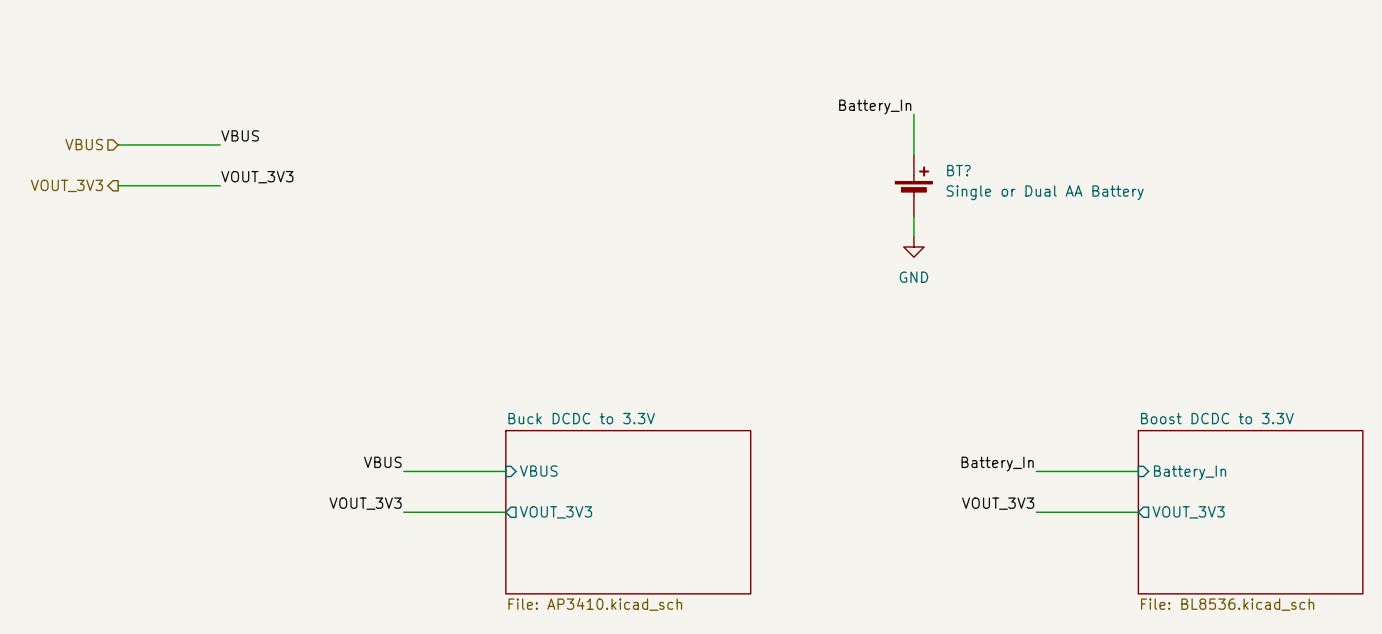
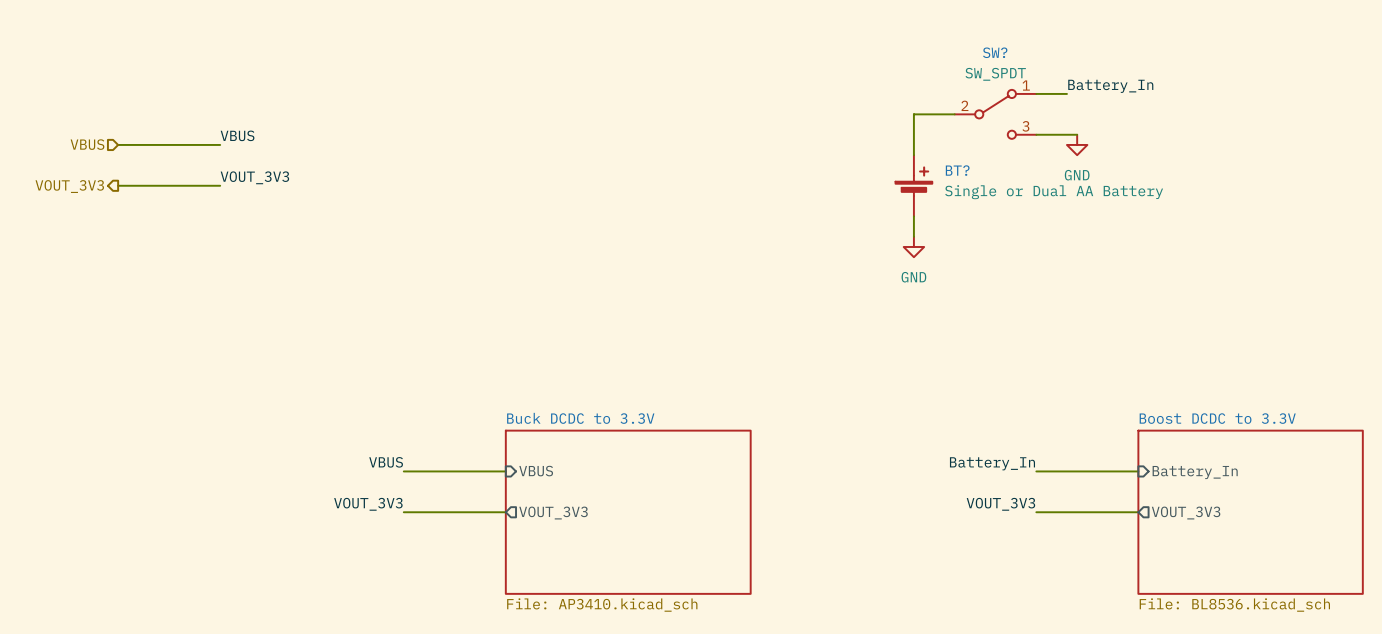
wire: none -> (1036, 93) (1066, 93)
label position: Battery_In (875, 106) -> Battery_In (1110, 86)
wire: none -> (913, 114) (954, 114)
SW?: none -> SW_SPDT (995, 114)
wire: none -> (1036, 134) (1077, 134)
power symbol: none -> GND (1077, 144)

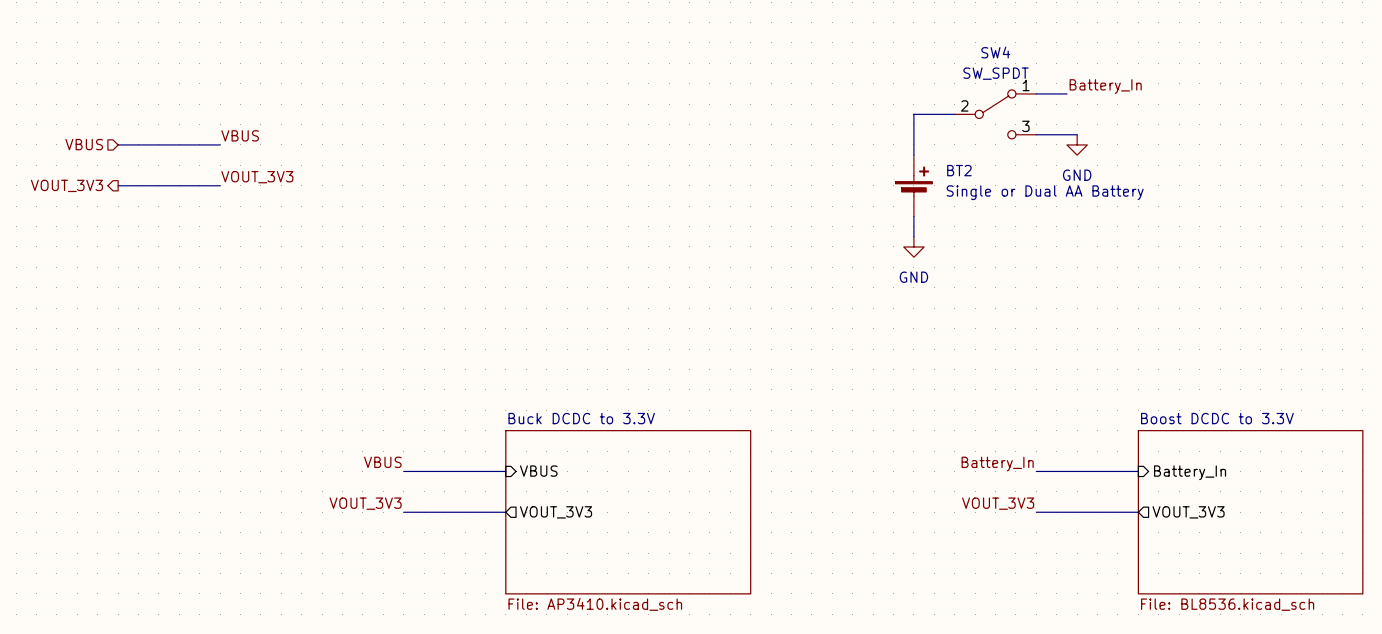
SW? name: SW? (995, 52) -> SW4 (995, 52)
BT? name: BT? (957, 170) -> BT2 (959, 170)

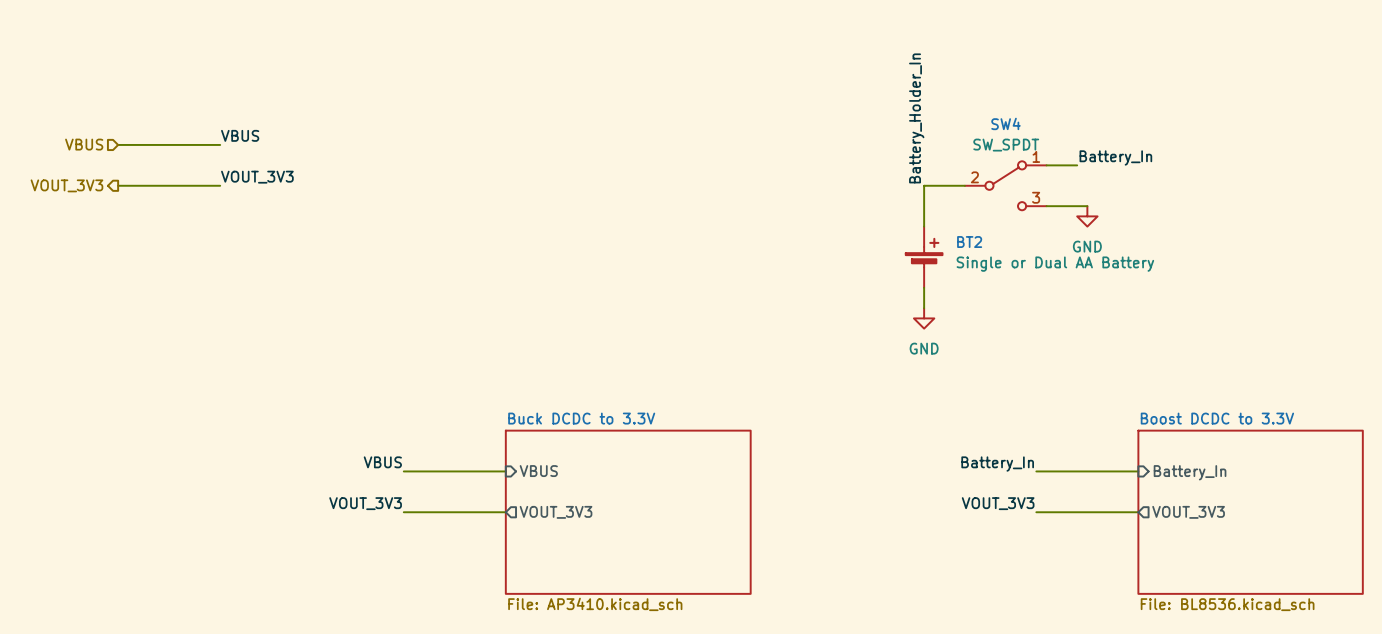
label position: Battery_In (1105, 86) -> Battery_In (1115, 157)
wire: (1036, 93) (1066, 93) -> (1046, 165) (1077, 165)
wire: (954, 114) (913, 114) (913, 155) -> (964, 185) (924, 185) (924, 226)
SW4 position: (995, 114) -> (1005, 185)
label: none -> Battery_Holder_In (916, 118)
wire: (1036, 134) (1077, 134) -> (1046, 206) (1087, 206)
power symbol position: GND (1077, 144) -> GND (1087, 216)
BT2 position: (913, 185) -> (924, 257)
wire: (913, 216) (913, 236) -> (924, 287) (924, 308)
power symbol position: GND (913, 246) -> GND (924, 318)

